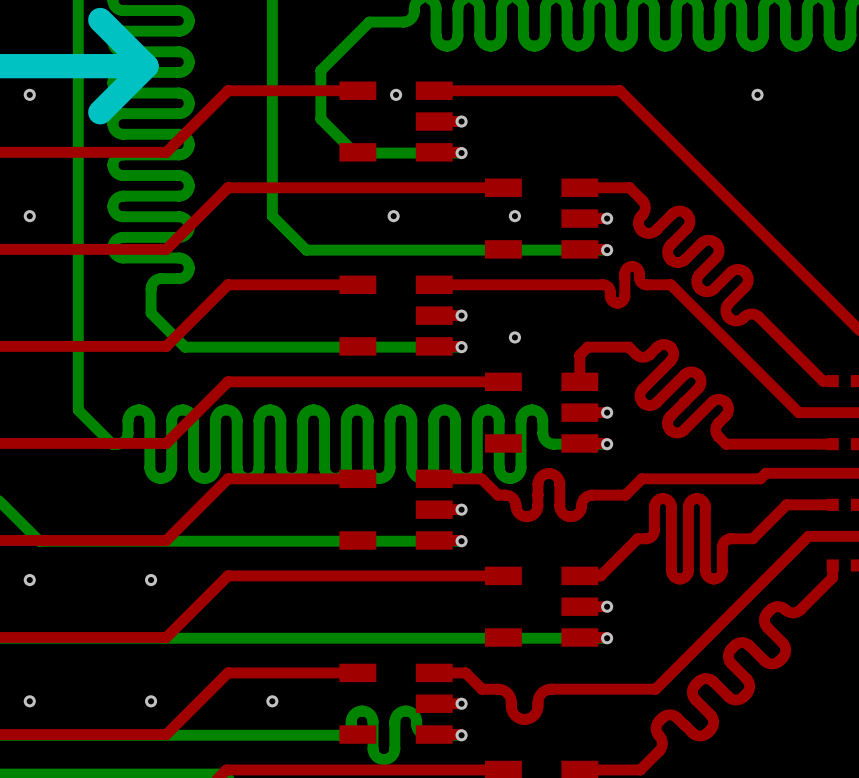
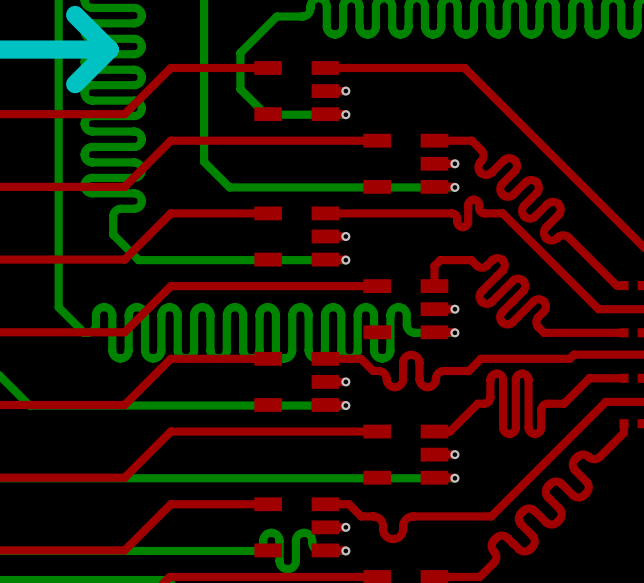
via: (29, 94) -> none
via: (396, 94) -> none
via: (757, 94) -> none
via: (29, 216) -> none
via: (393, 216) -> none
via: (514, 216) -> none
via: (514, 337) -> none
via: (29, 580) -> none
via: (151, 580) -> none
via: (29, 701) -> none
via: (151, 701) -> none
via: (272, 701) -> none

